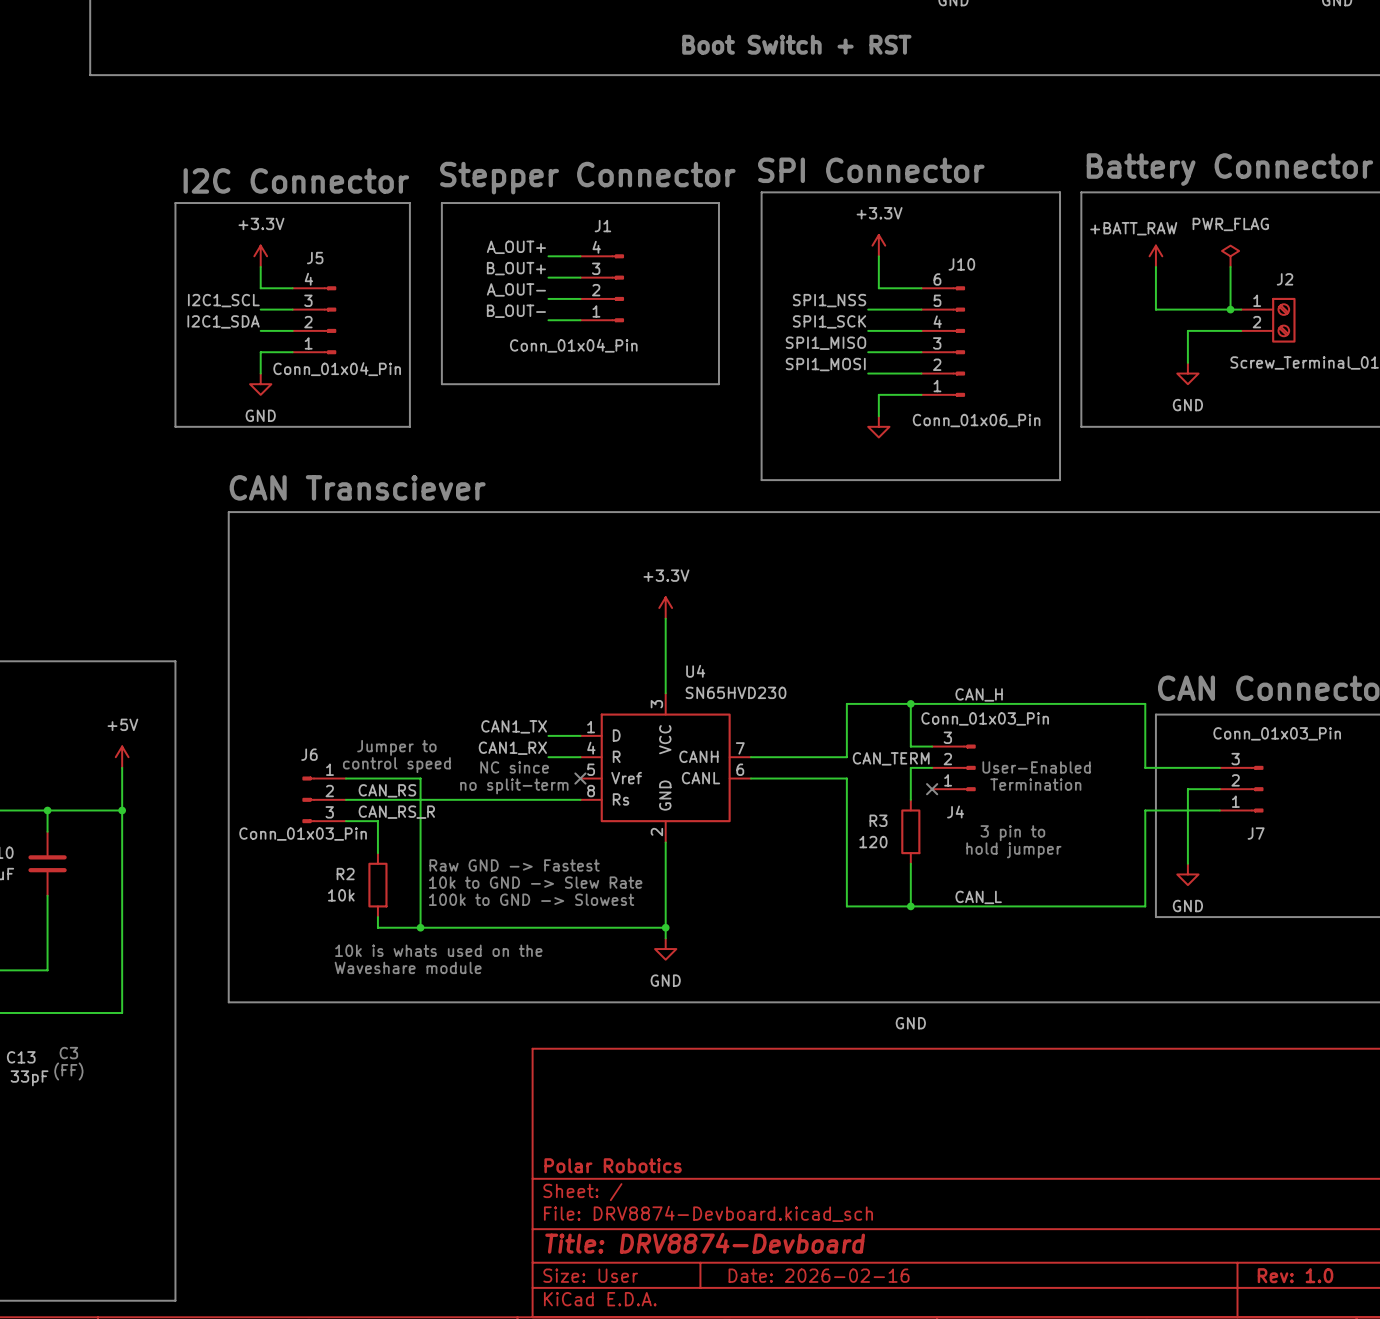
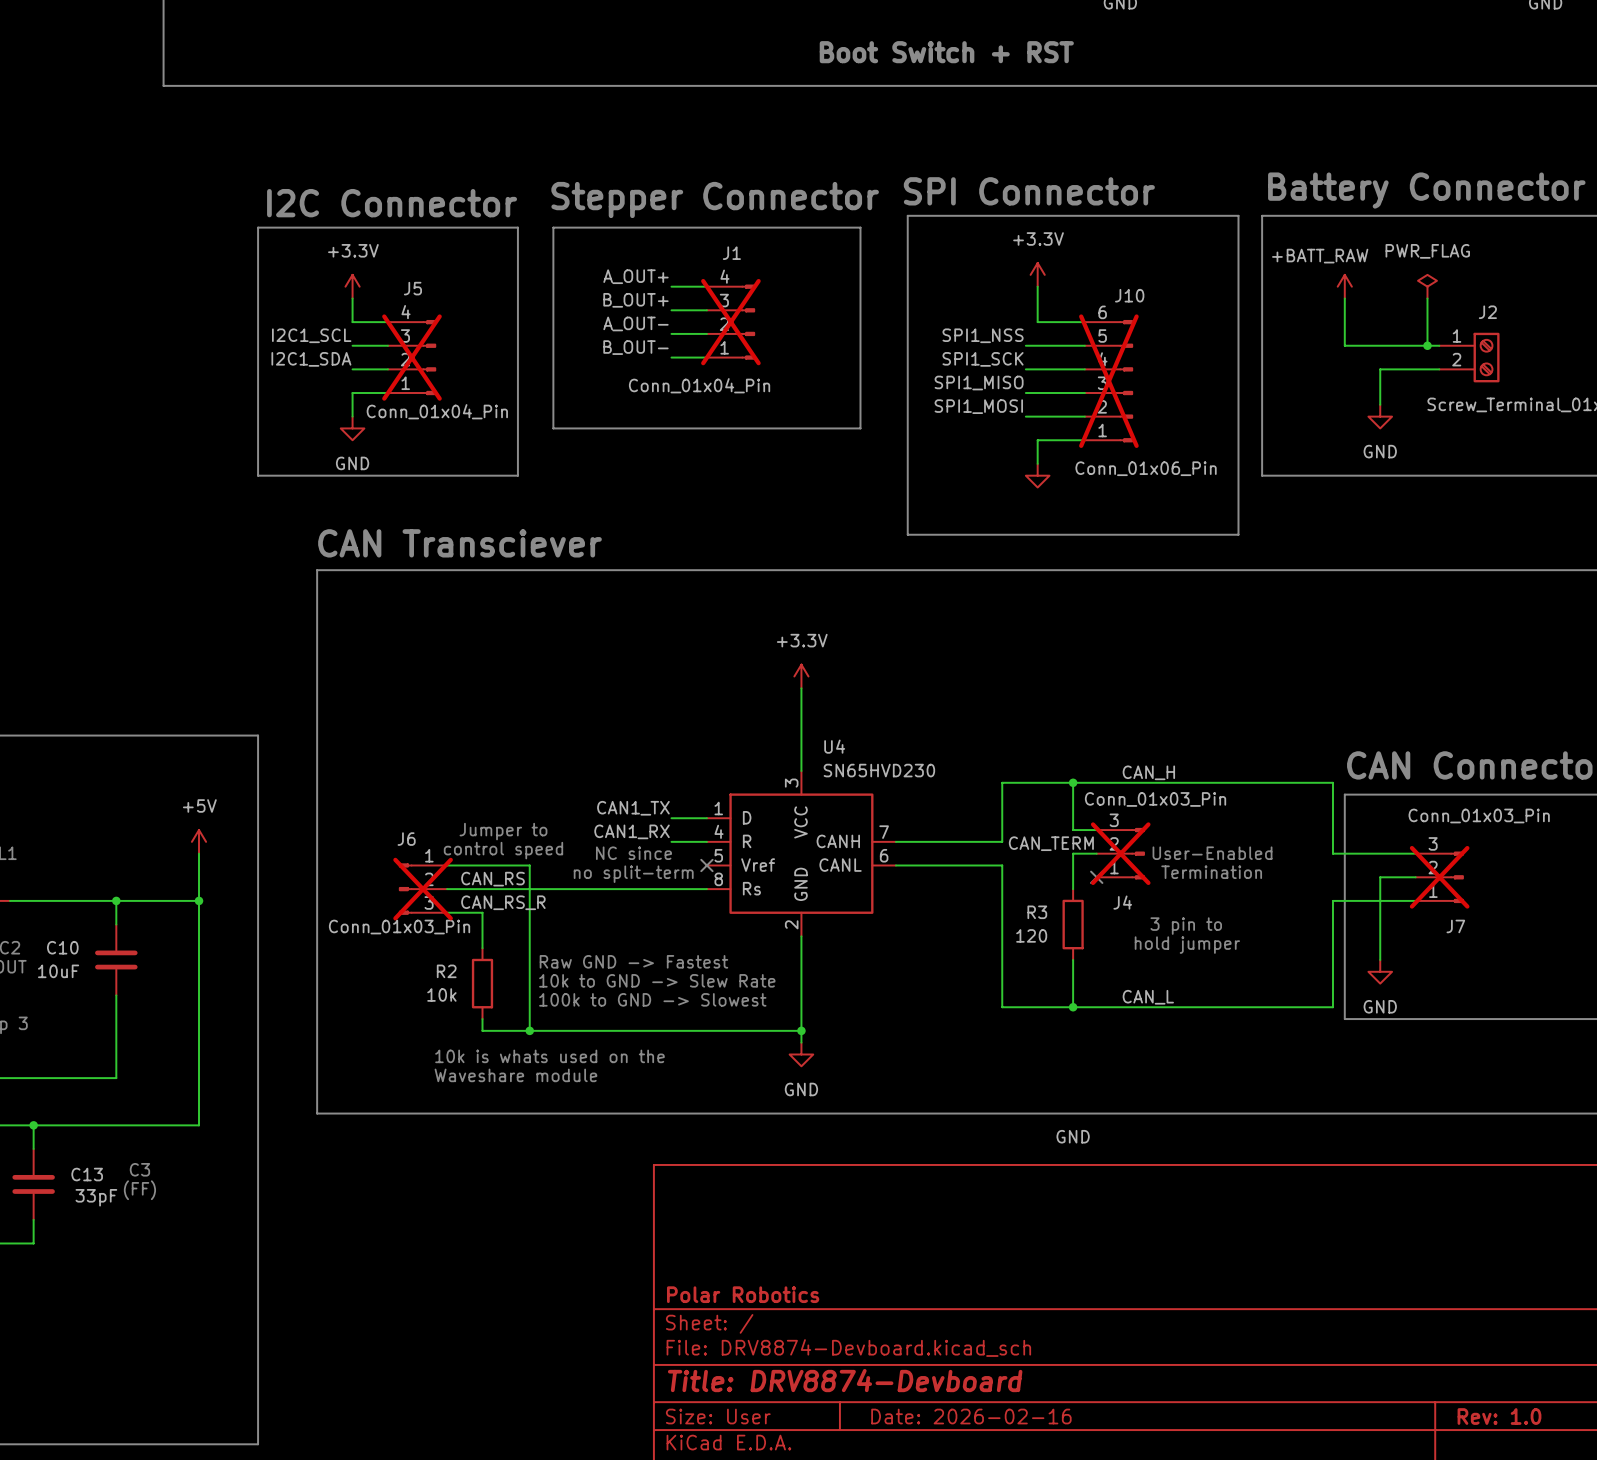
J1 do-not-place cross: none -> (730, 322)
J5 do-not-place cross: none -> (411, 357)
J10 do-not-place cross: none -> (1108, 381)
J4 do-not-place cross: none -> (1120, 853)
J7 do-not-place cross: none -> (1439, 877)
J6 do-not-place cross: none -> (423, 889)

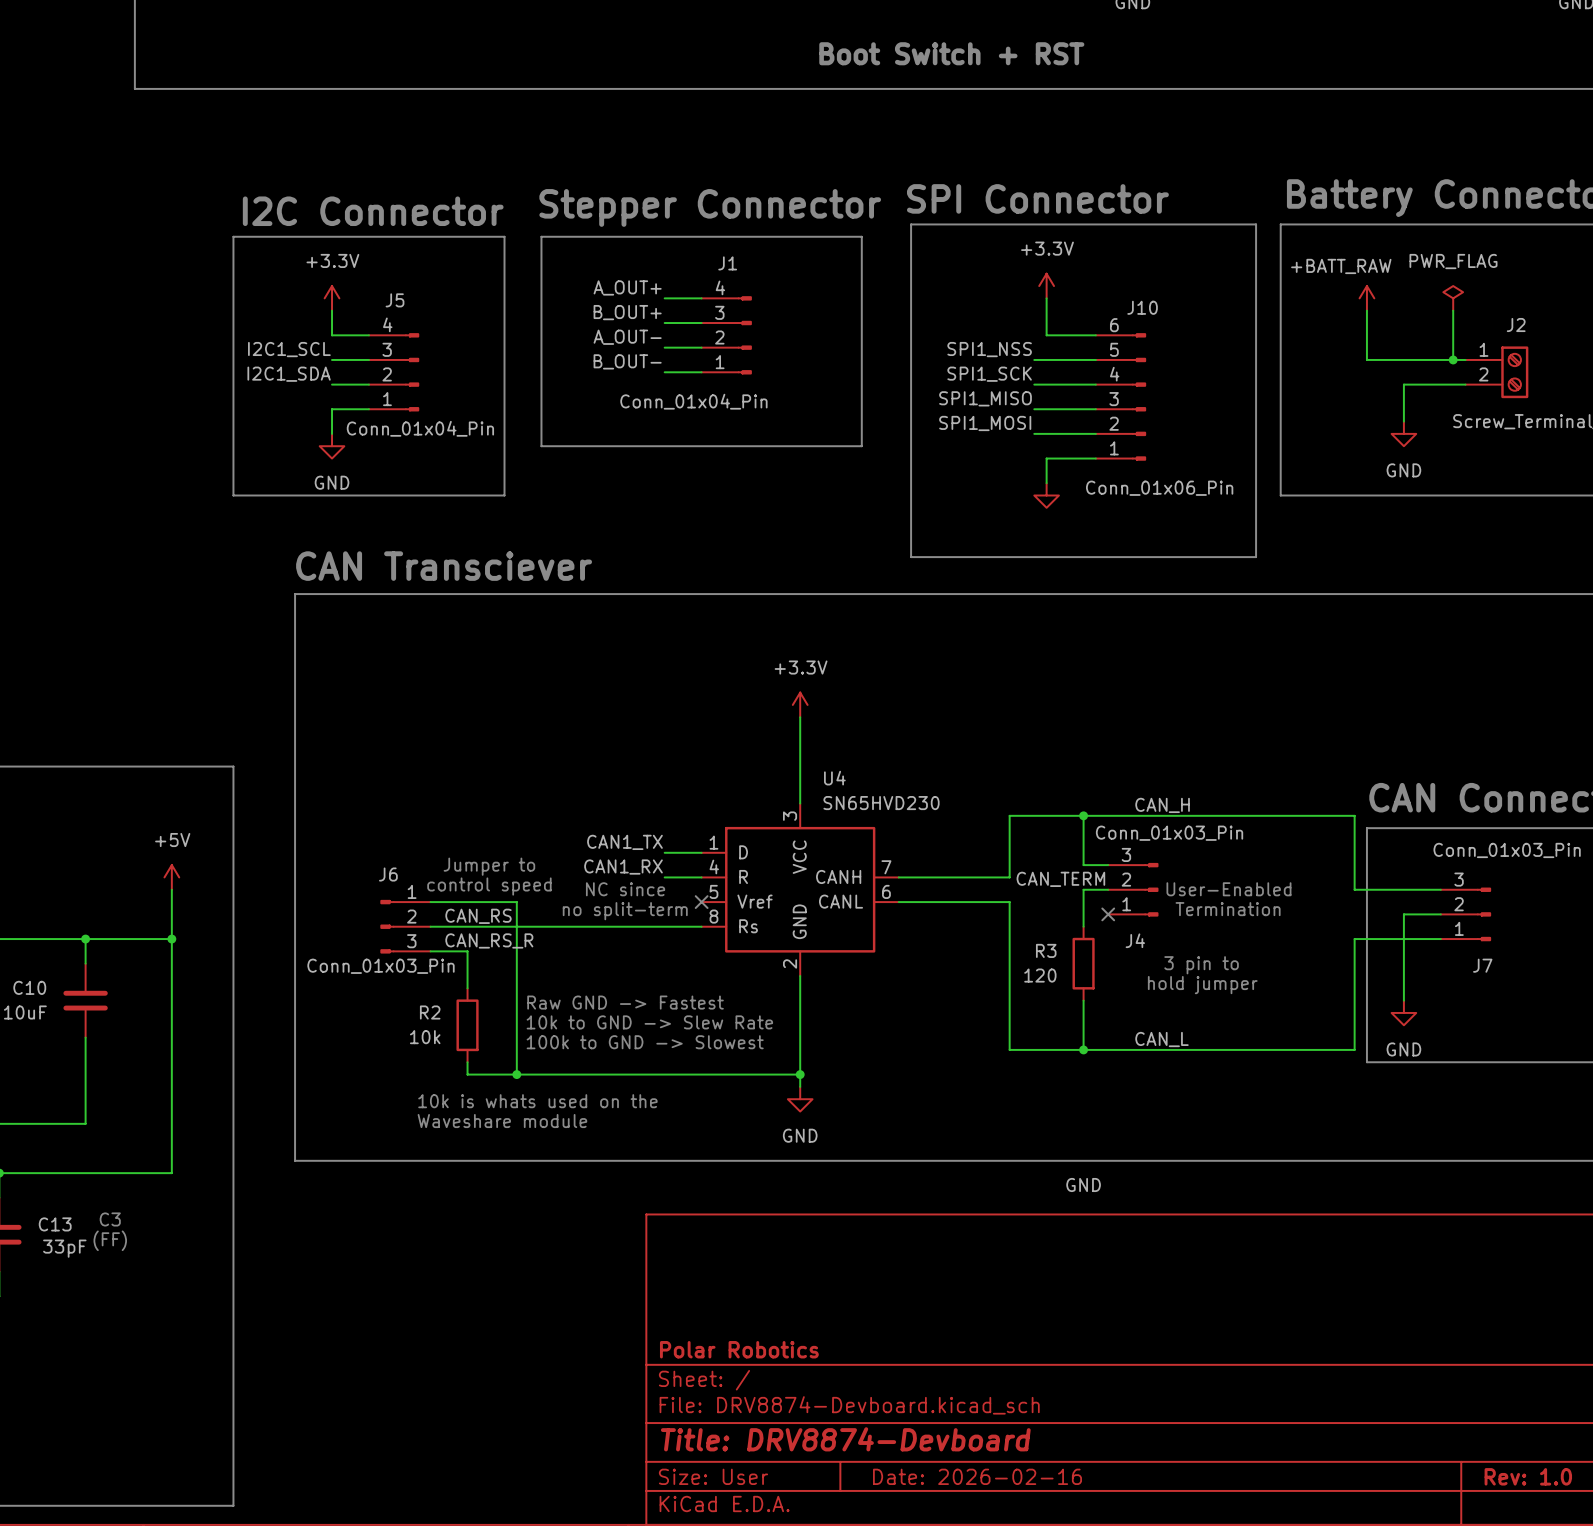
J1 do-not-place cross: (730, 322) -> none
J5 do-not-place cross: (411, 357) -> none
J10 do-not-place cross: (1108, 381) -> none
J4 do-not-place cross: (1120, 853) -> none
J7 do-not-place cross: (1439, 877) -> none
J6 do-not-place cross: (423, 889) -> none

